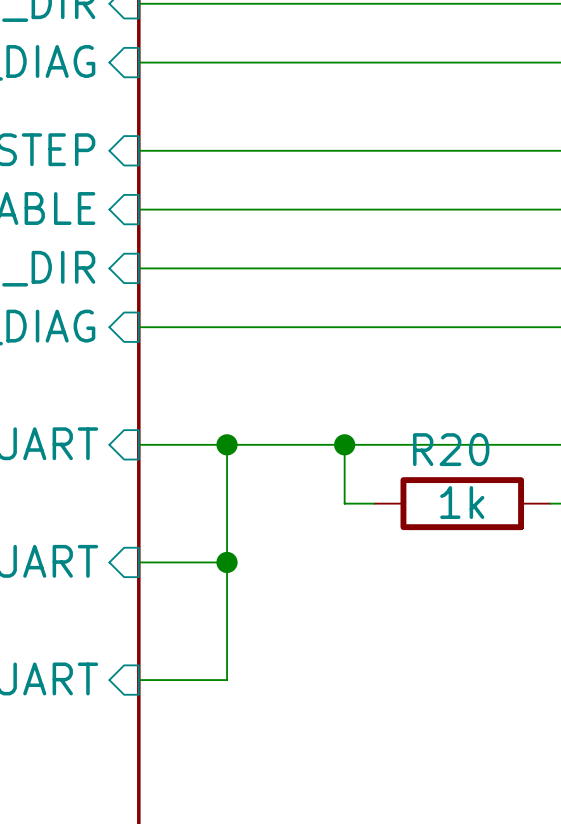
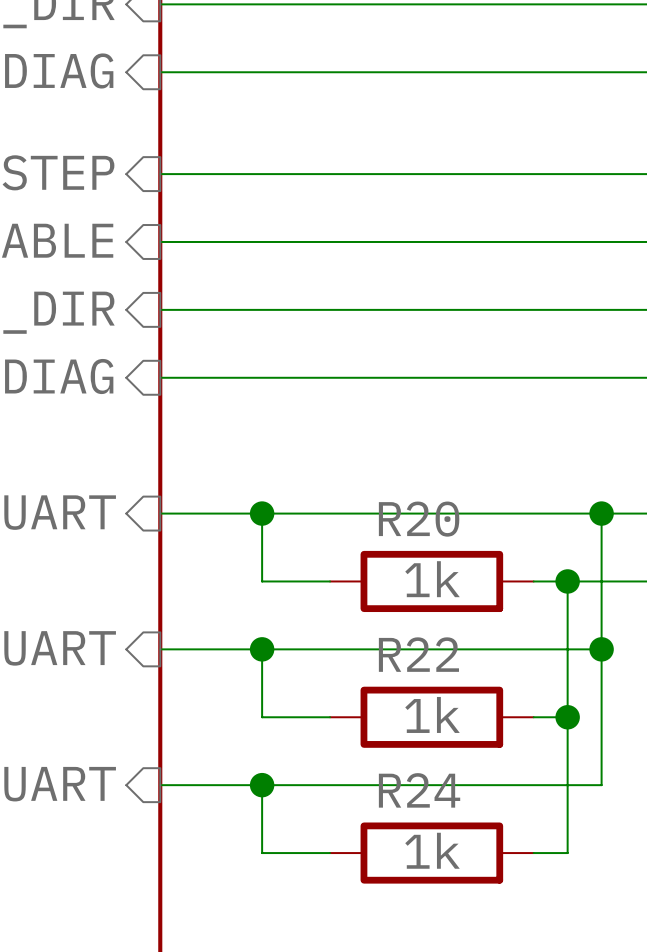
wire: (344, 444) (344, 503) (374, 503) -> none
junction: (344, 444) -> none
wire: none -> (601, 513) (601, 785) (262, 785) (262, 853) (330, 853)
junction: none -> (601, 513)
wire: (227, 503) (227, 562) -> (262, 581) (330, 581)
wire: none -> (533, 581) (635, 581)
R20 position: (462, 503) -> (431, 581)
wire: none -> (567, 581) (567, 853) (533, 853)
junction: none -> (567, 581)
wire: none -> (262, 649) (601, 649)
junction: none -> (601, 649)
wire: (227, 621) (227, 680) -> (262, 717) (330, 717)
R22: none -> 1k (431, 717)
wire: none -> (533, 717) (567, 717)
junction: none -> (567, 717)
junction: none -> (262, 785)
R24: none -> 1k (431, 853)

